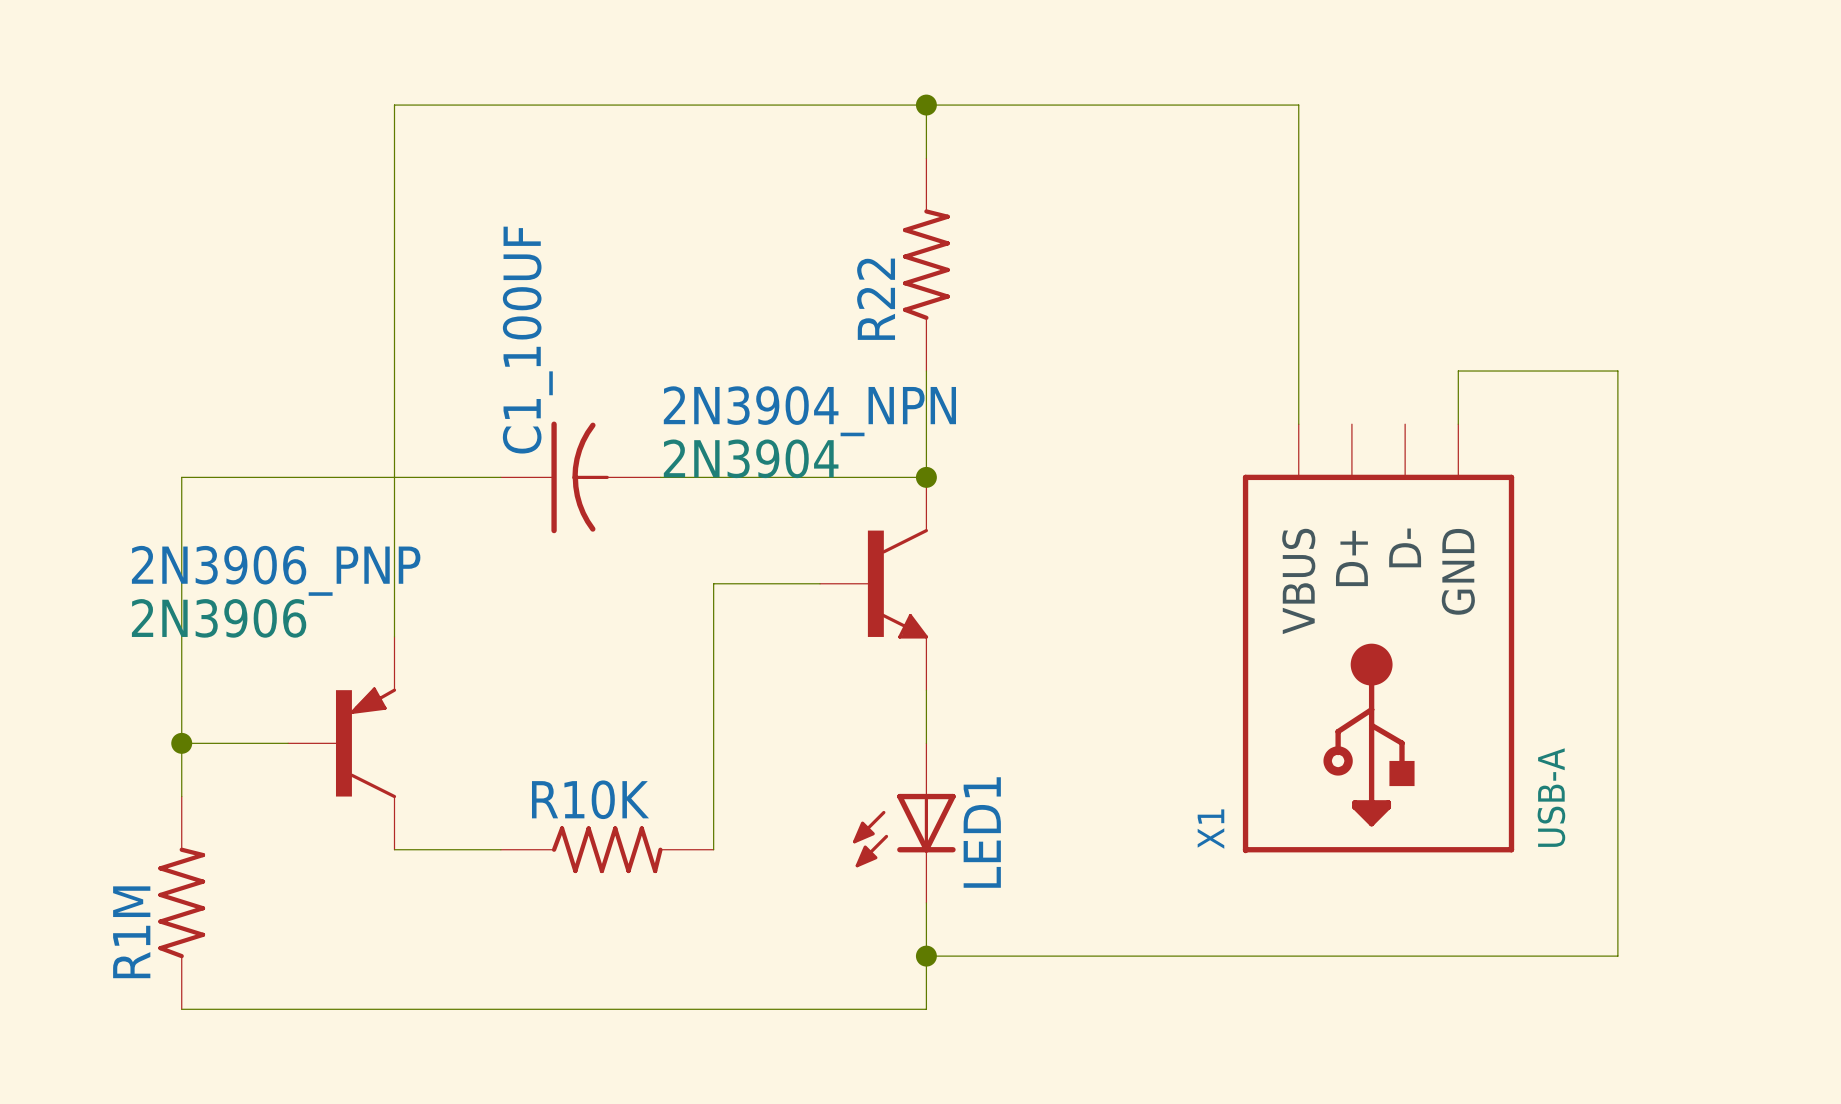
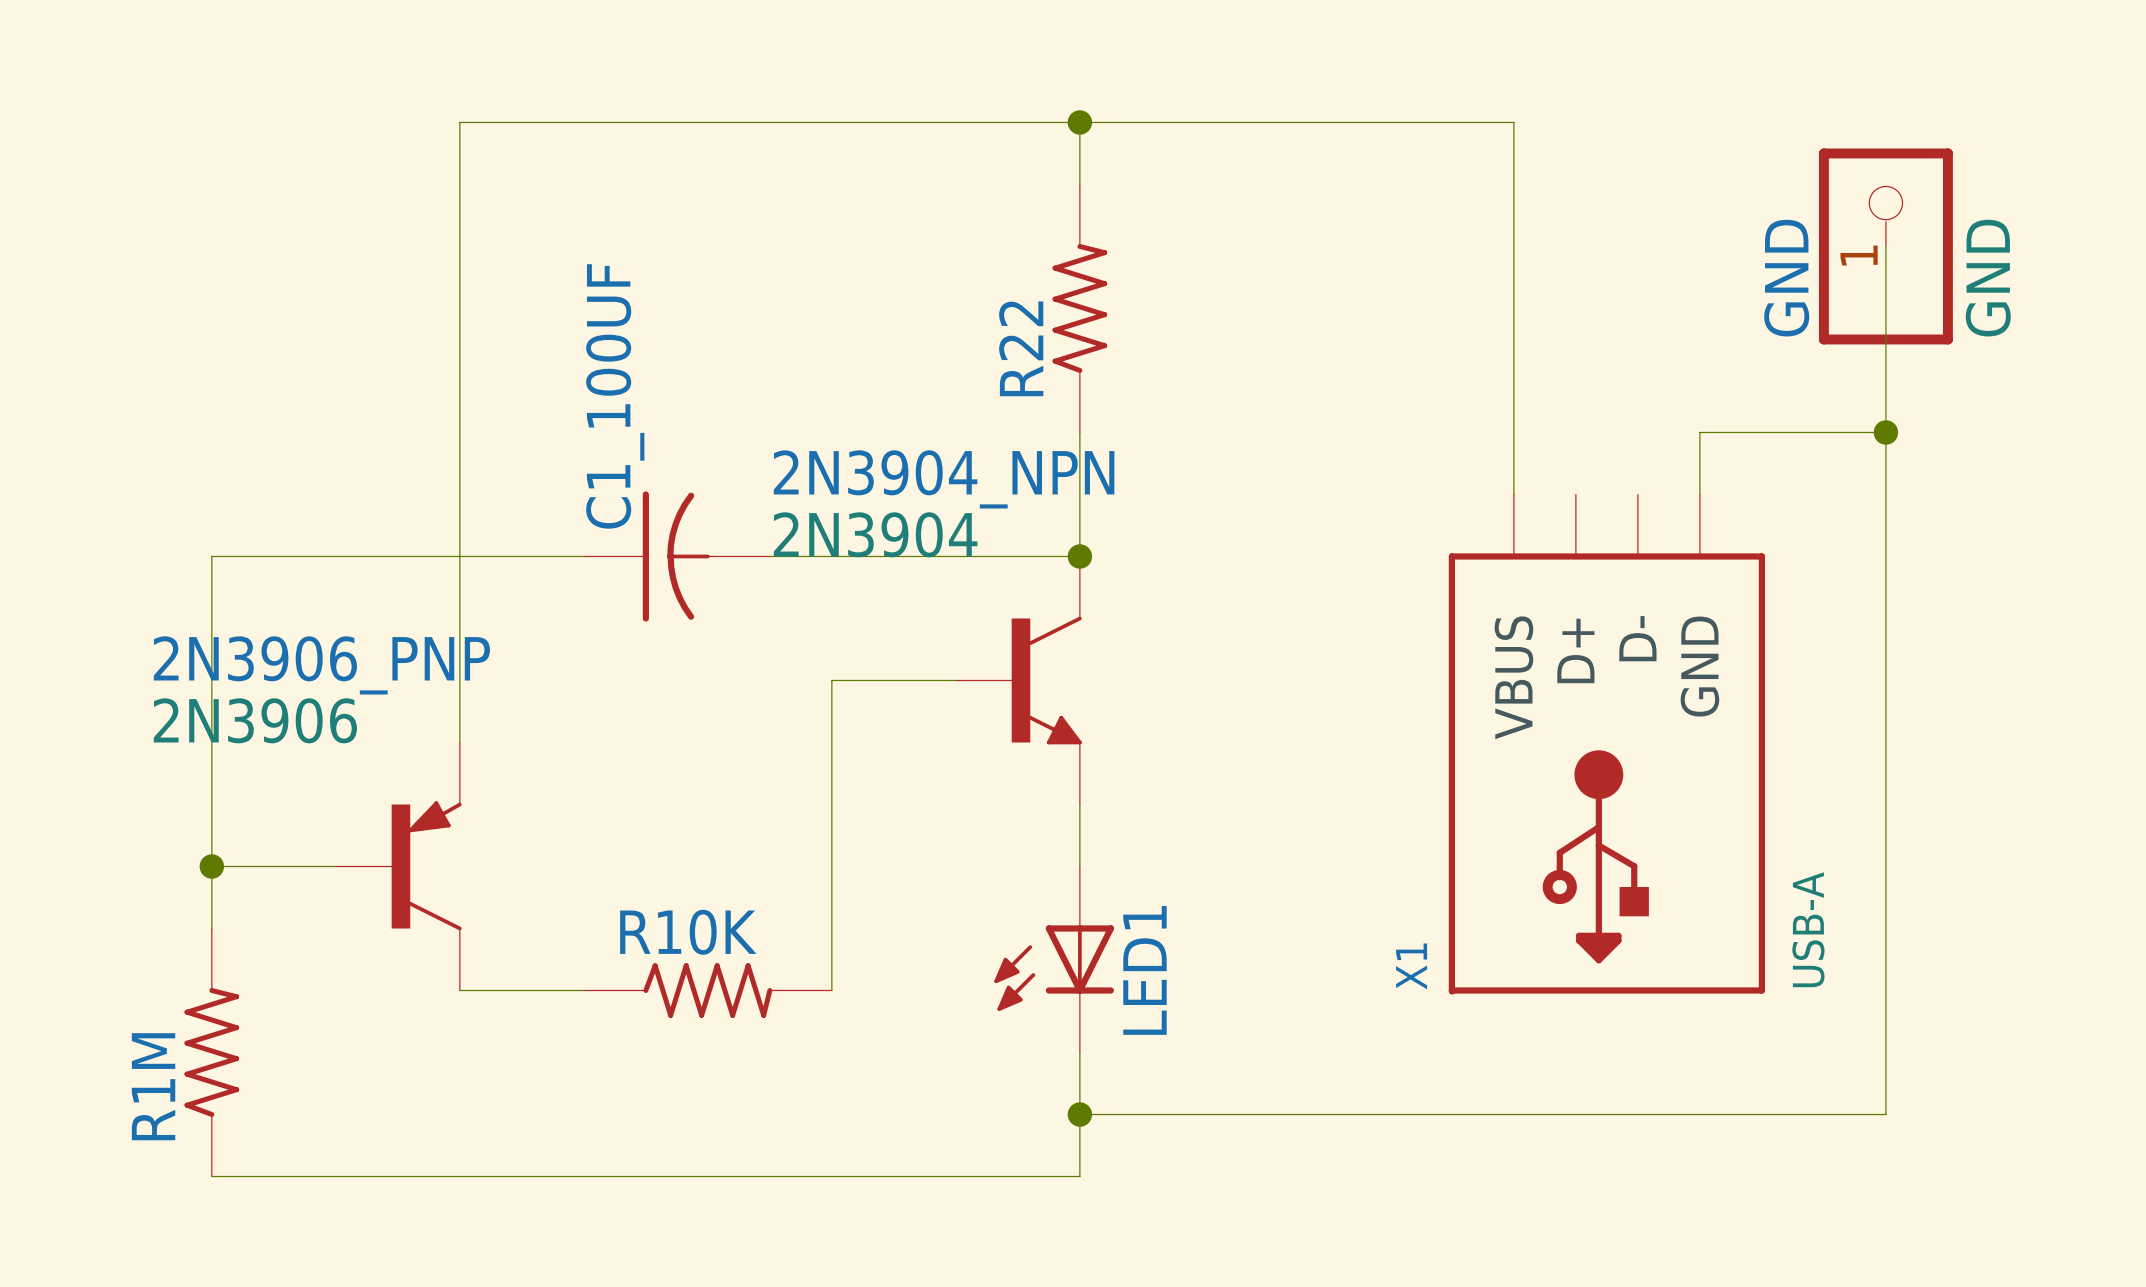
wire: none -> (1885, 246) (1885, 432)
GND: none -> GND (1885, 246)
junction: none -> (1885, 432)

